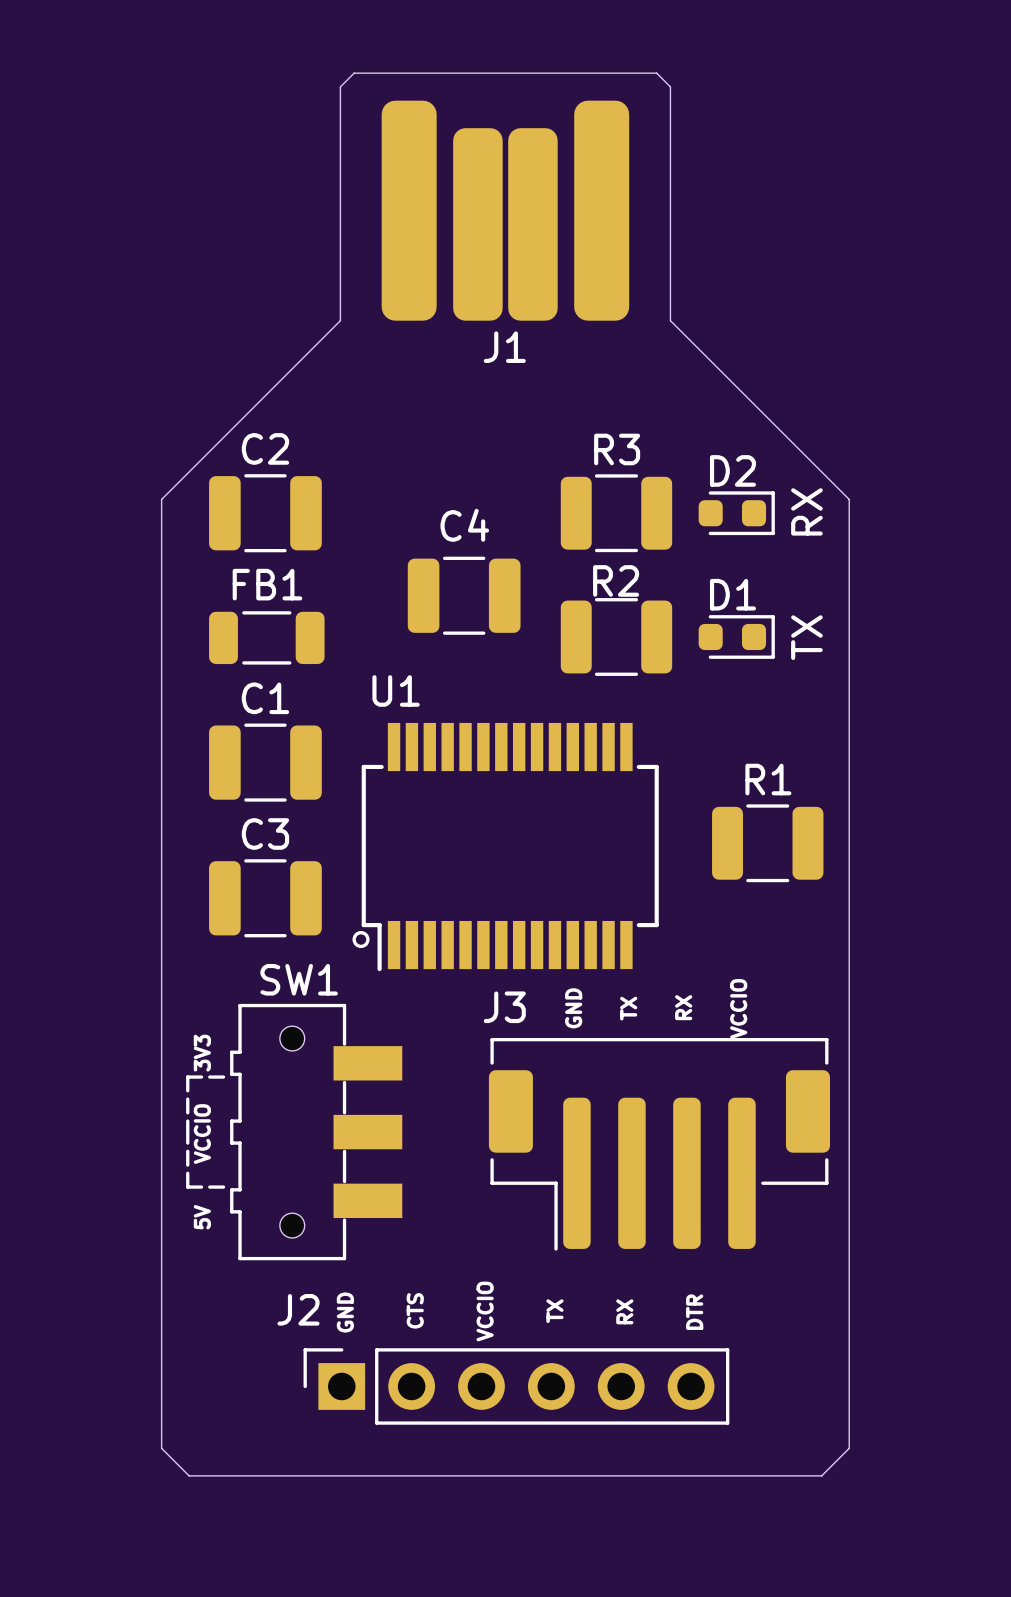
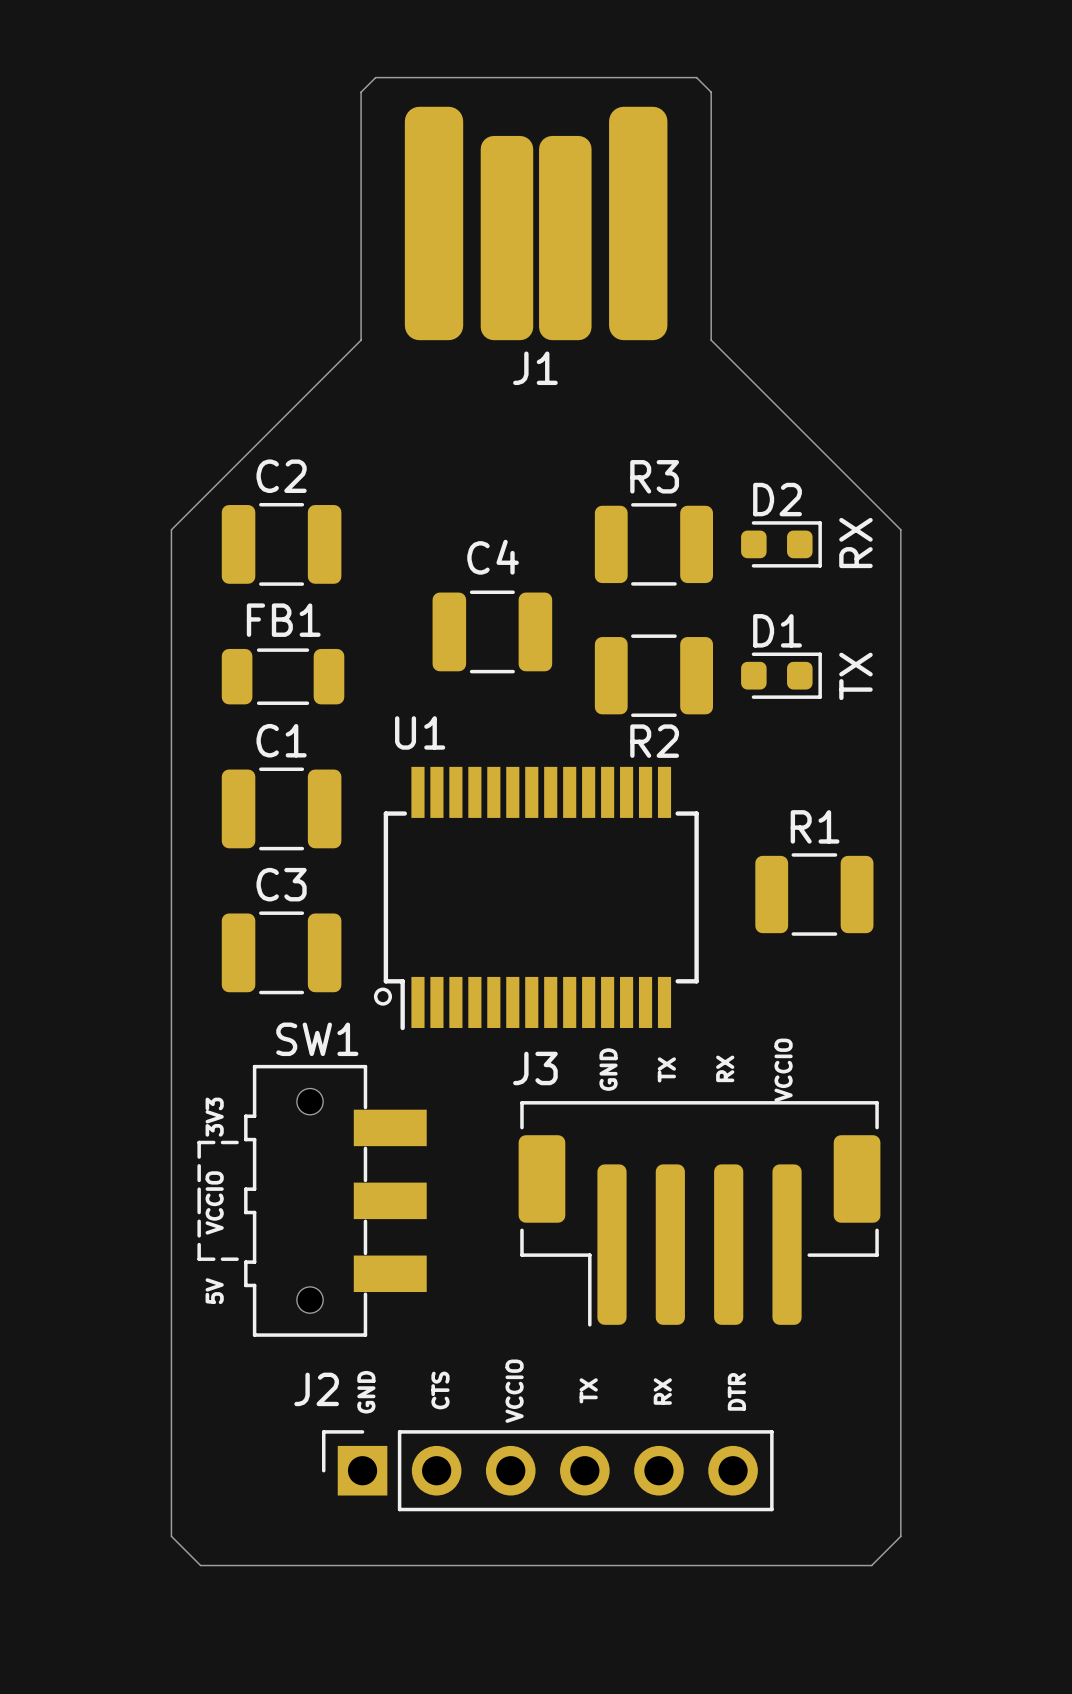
R2 name position: R2 (616, 580) -> R2 (654, 741)

